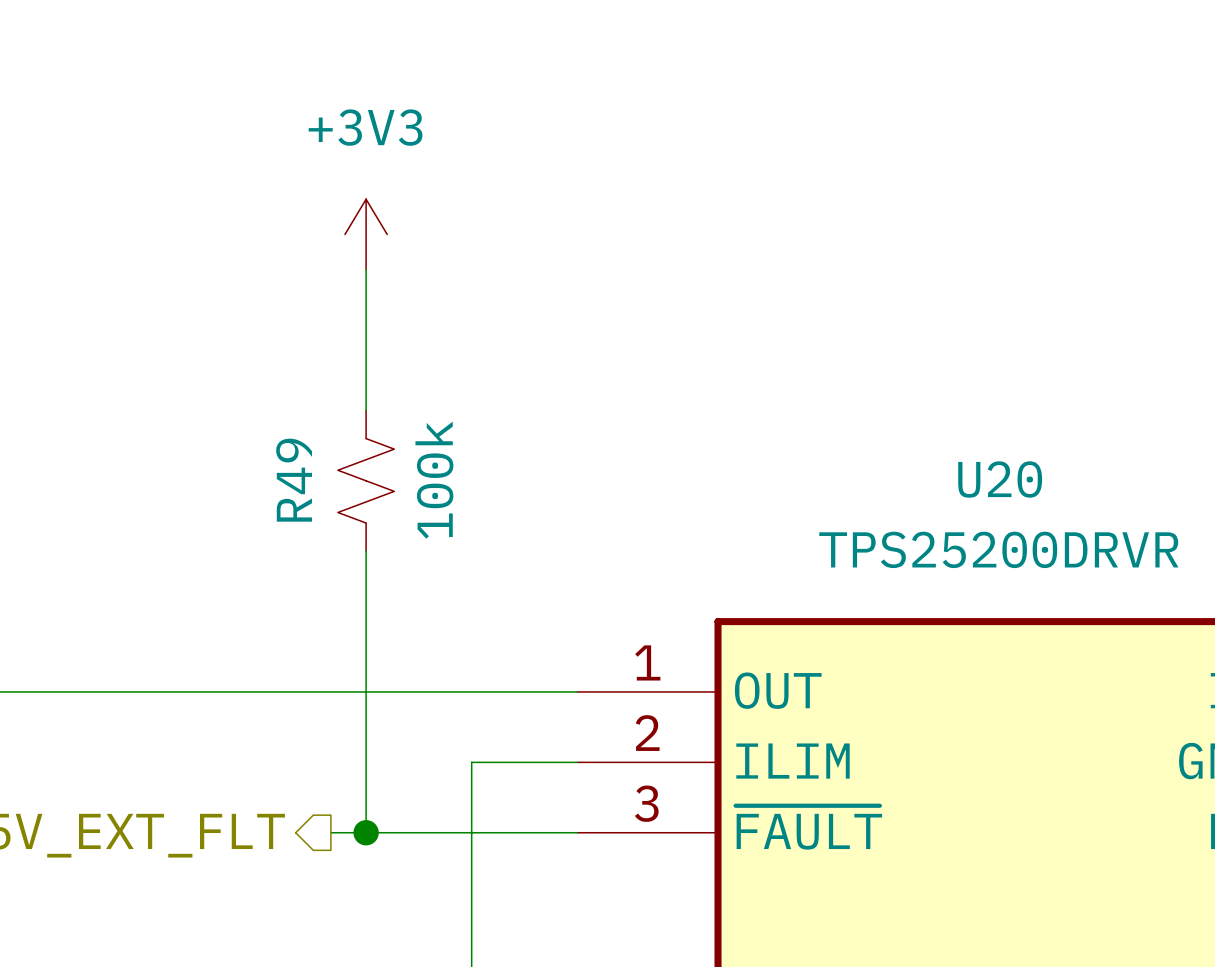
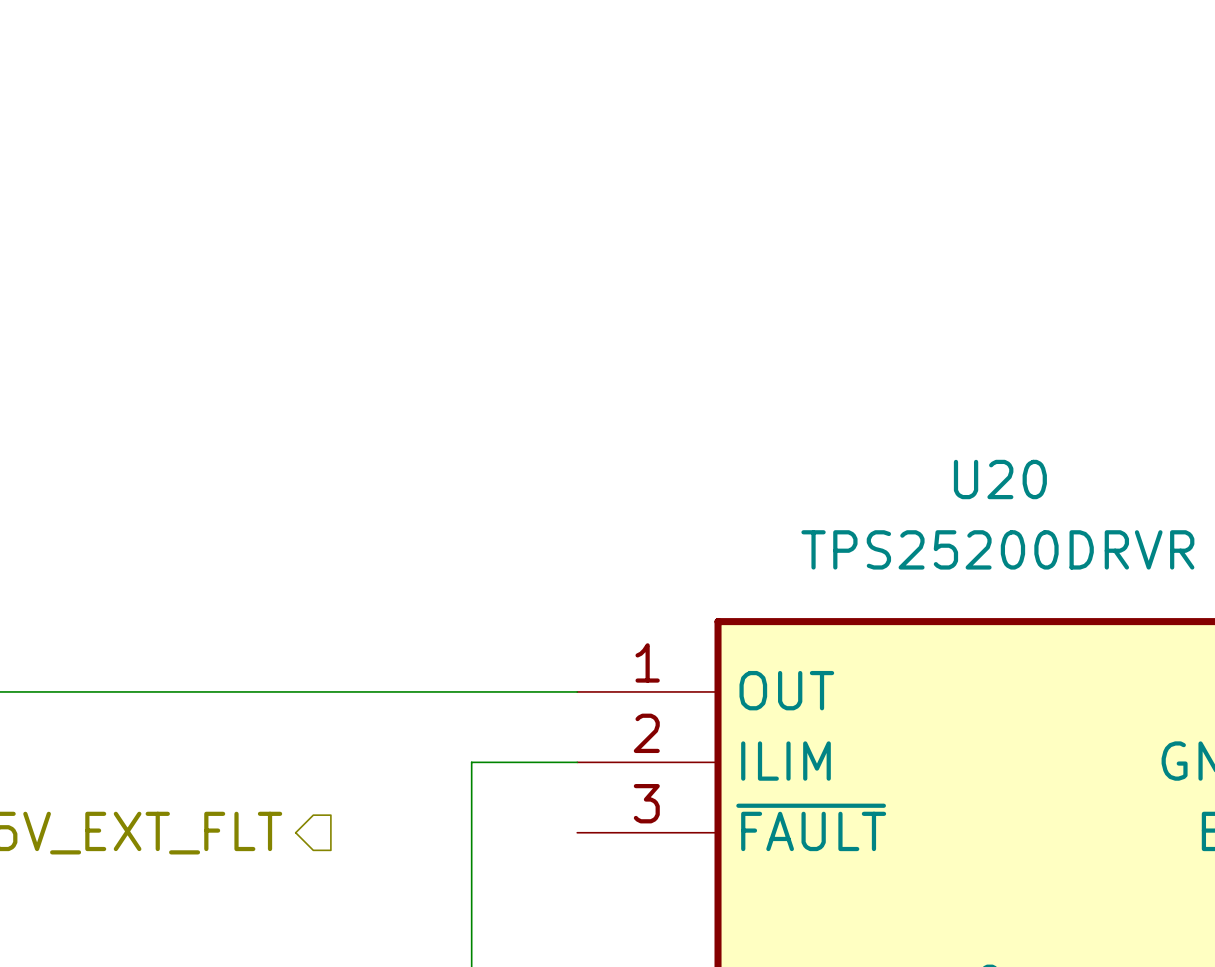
power symbol: +3V3 (366, 234) -> none
wire: (366, 269) (366, 410) -> none
R49: 100k (366, 480) -> none
wire: (366, 551) (366, 832) -> none
wire: (330, 832) (577, 832) -> none
junction: (366, 832) -> none

